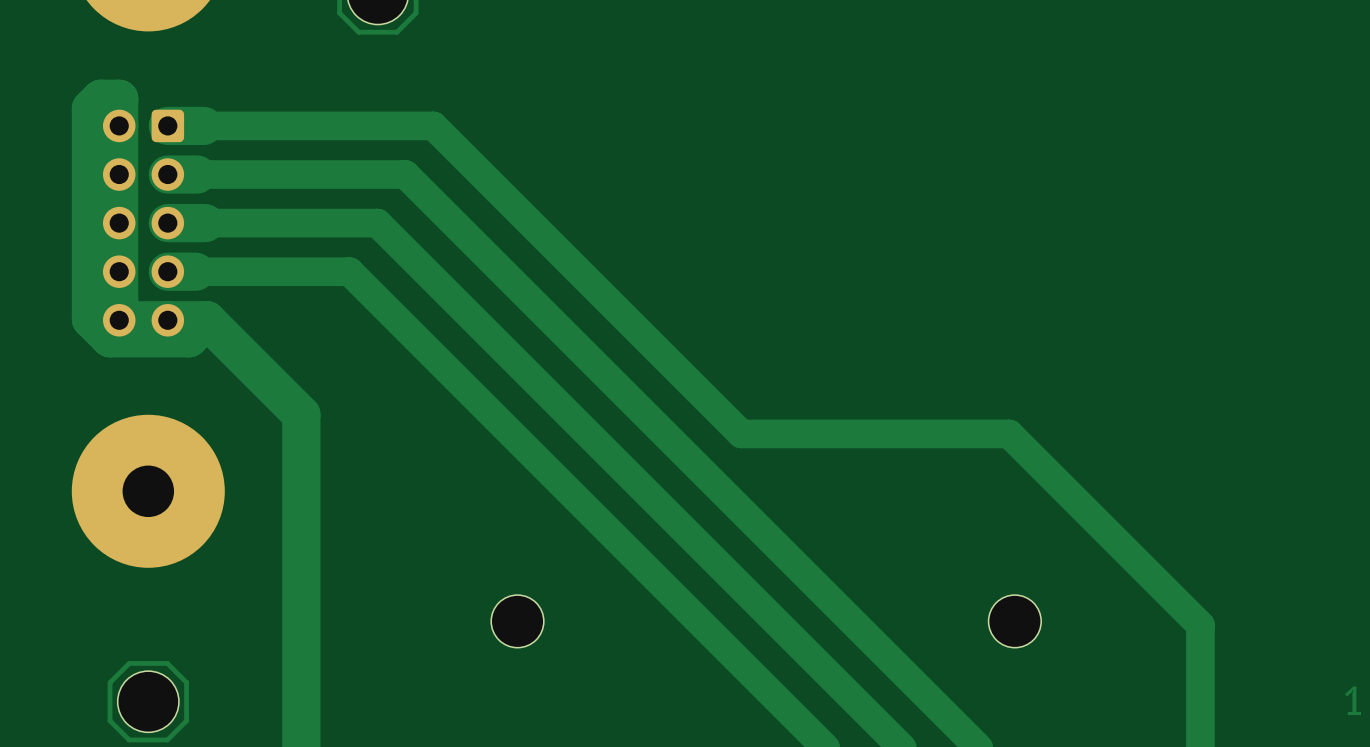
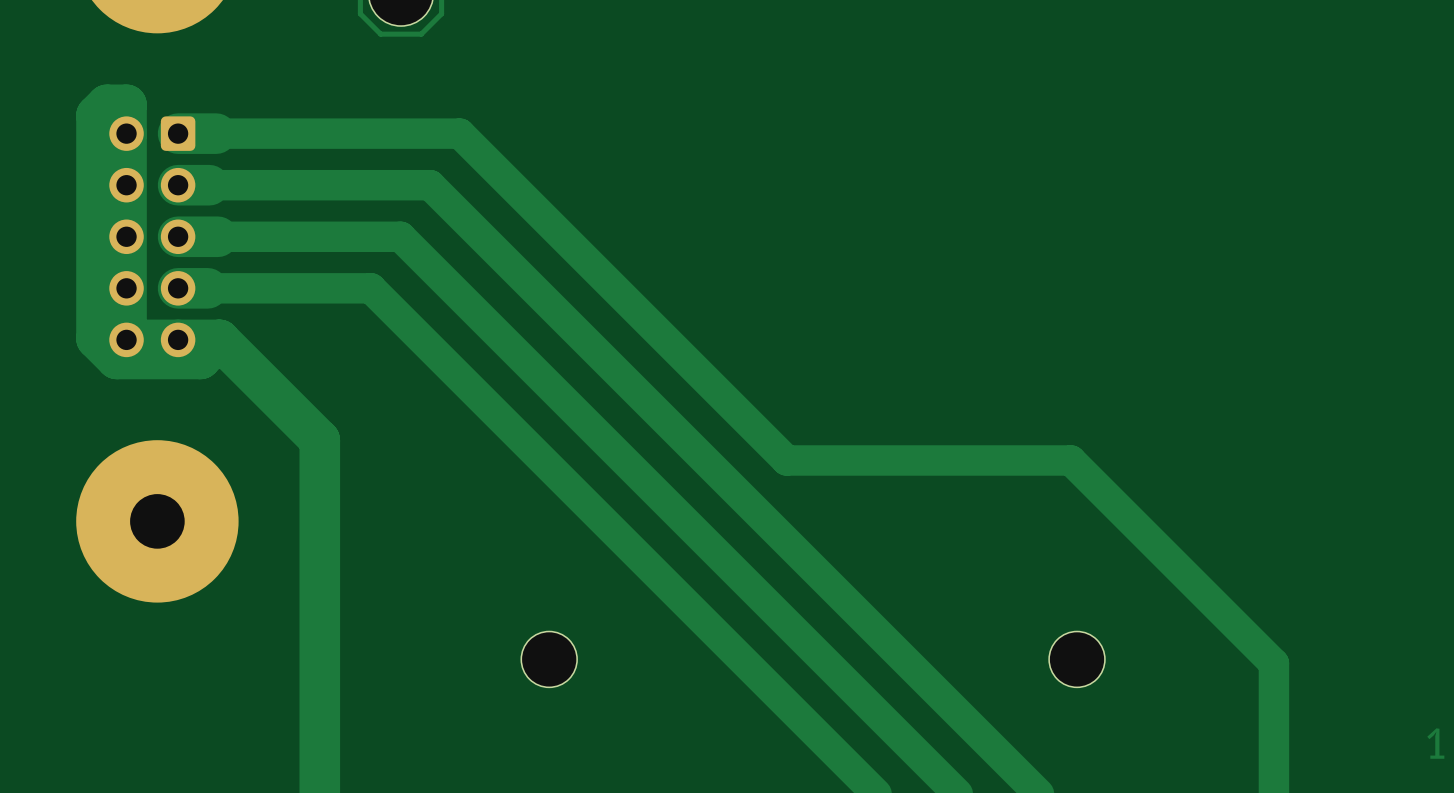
track: (167, 663) (129, 663) (110, 682) (110, 720) (129, 739) (167, 739) (186, 720) (186, 682) (167, 663) -> none
part: (148, 701) -> none

